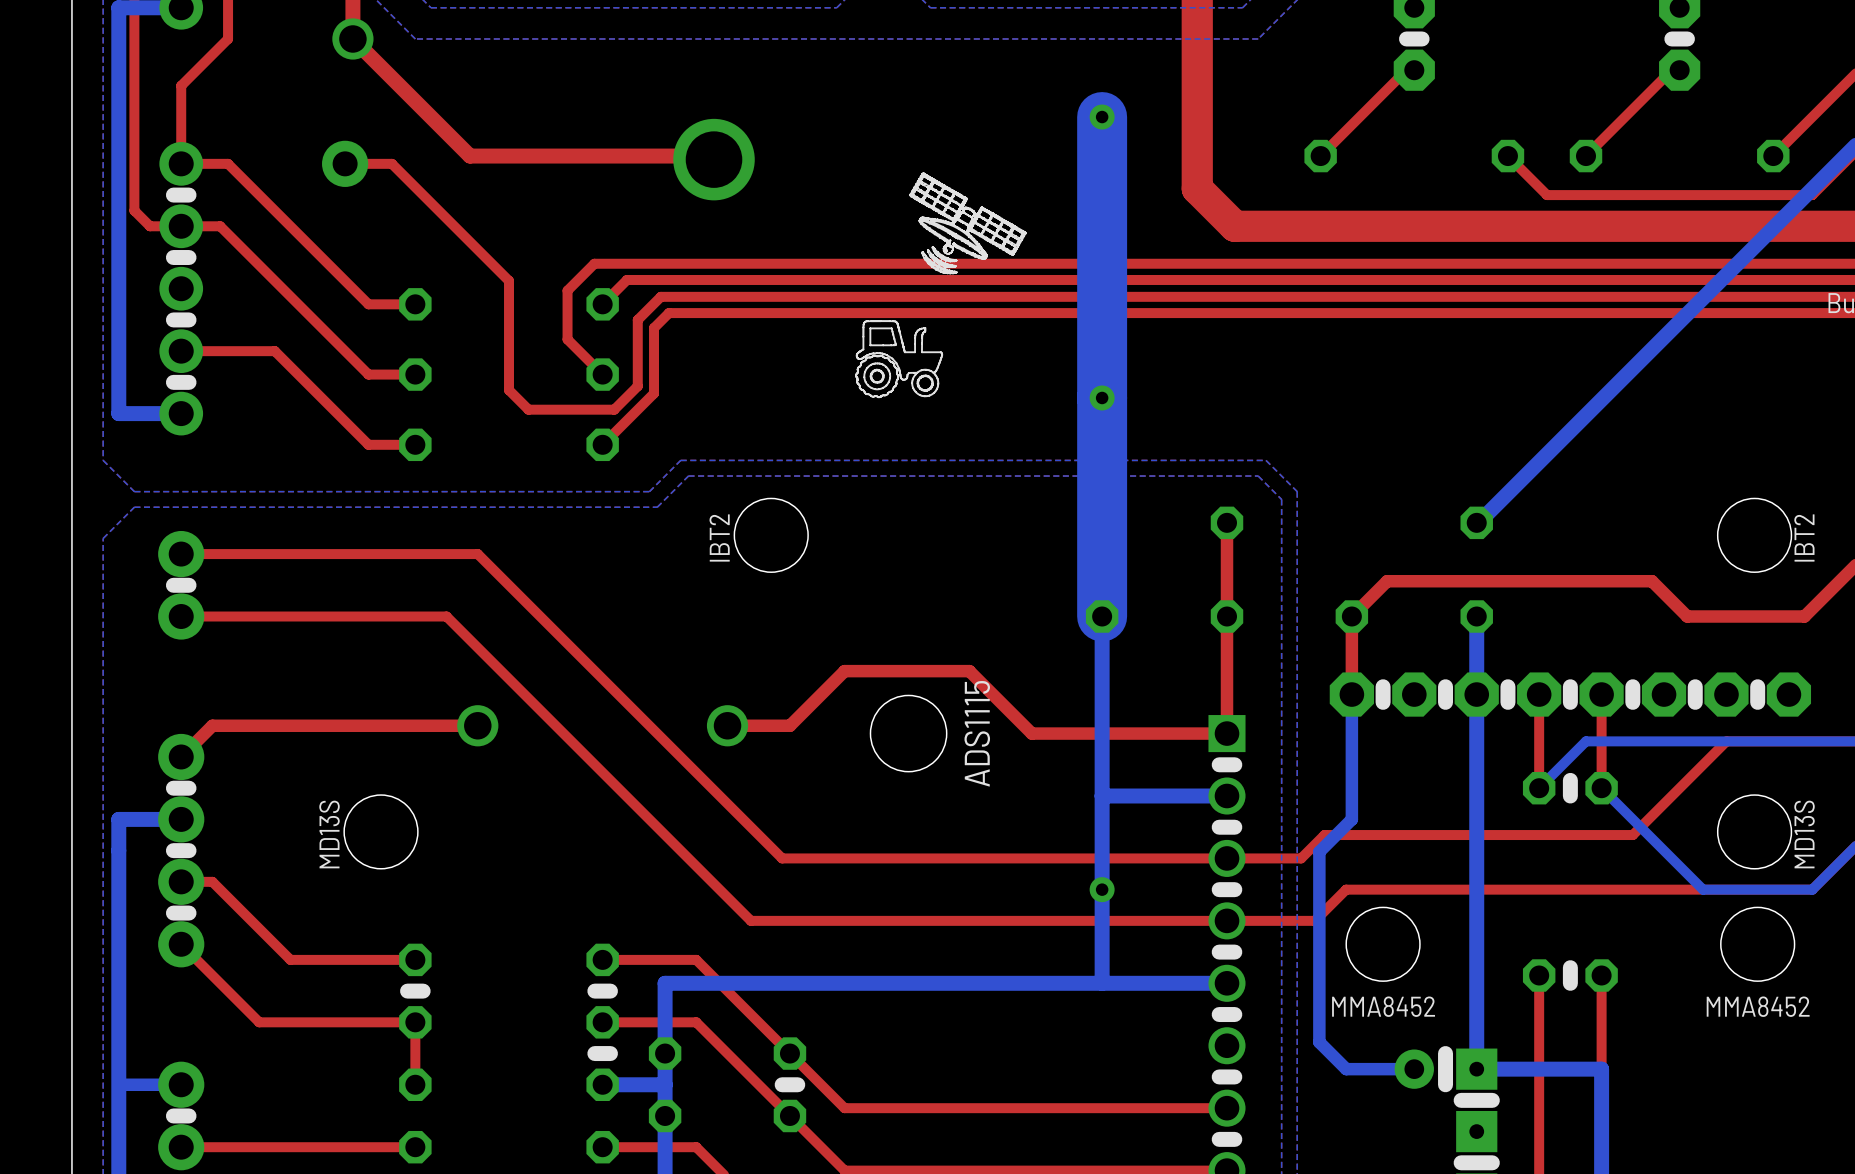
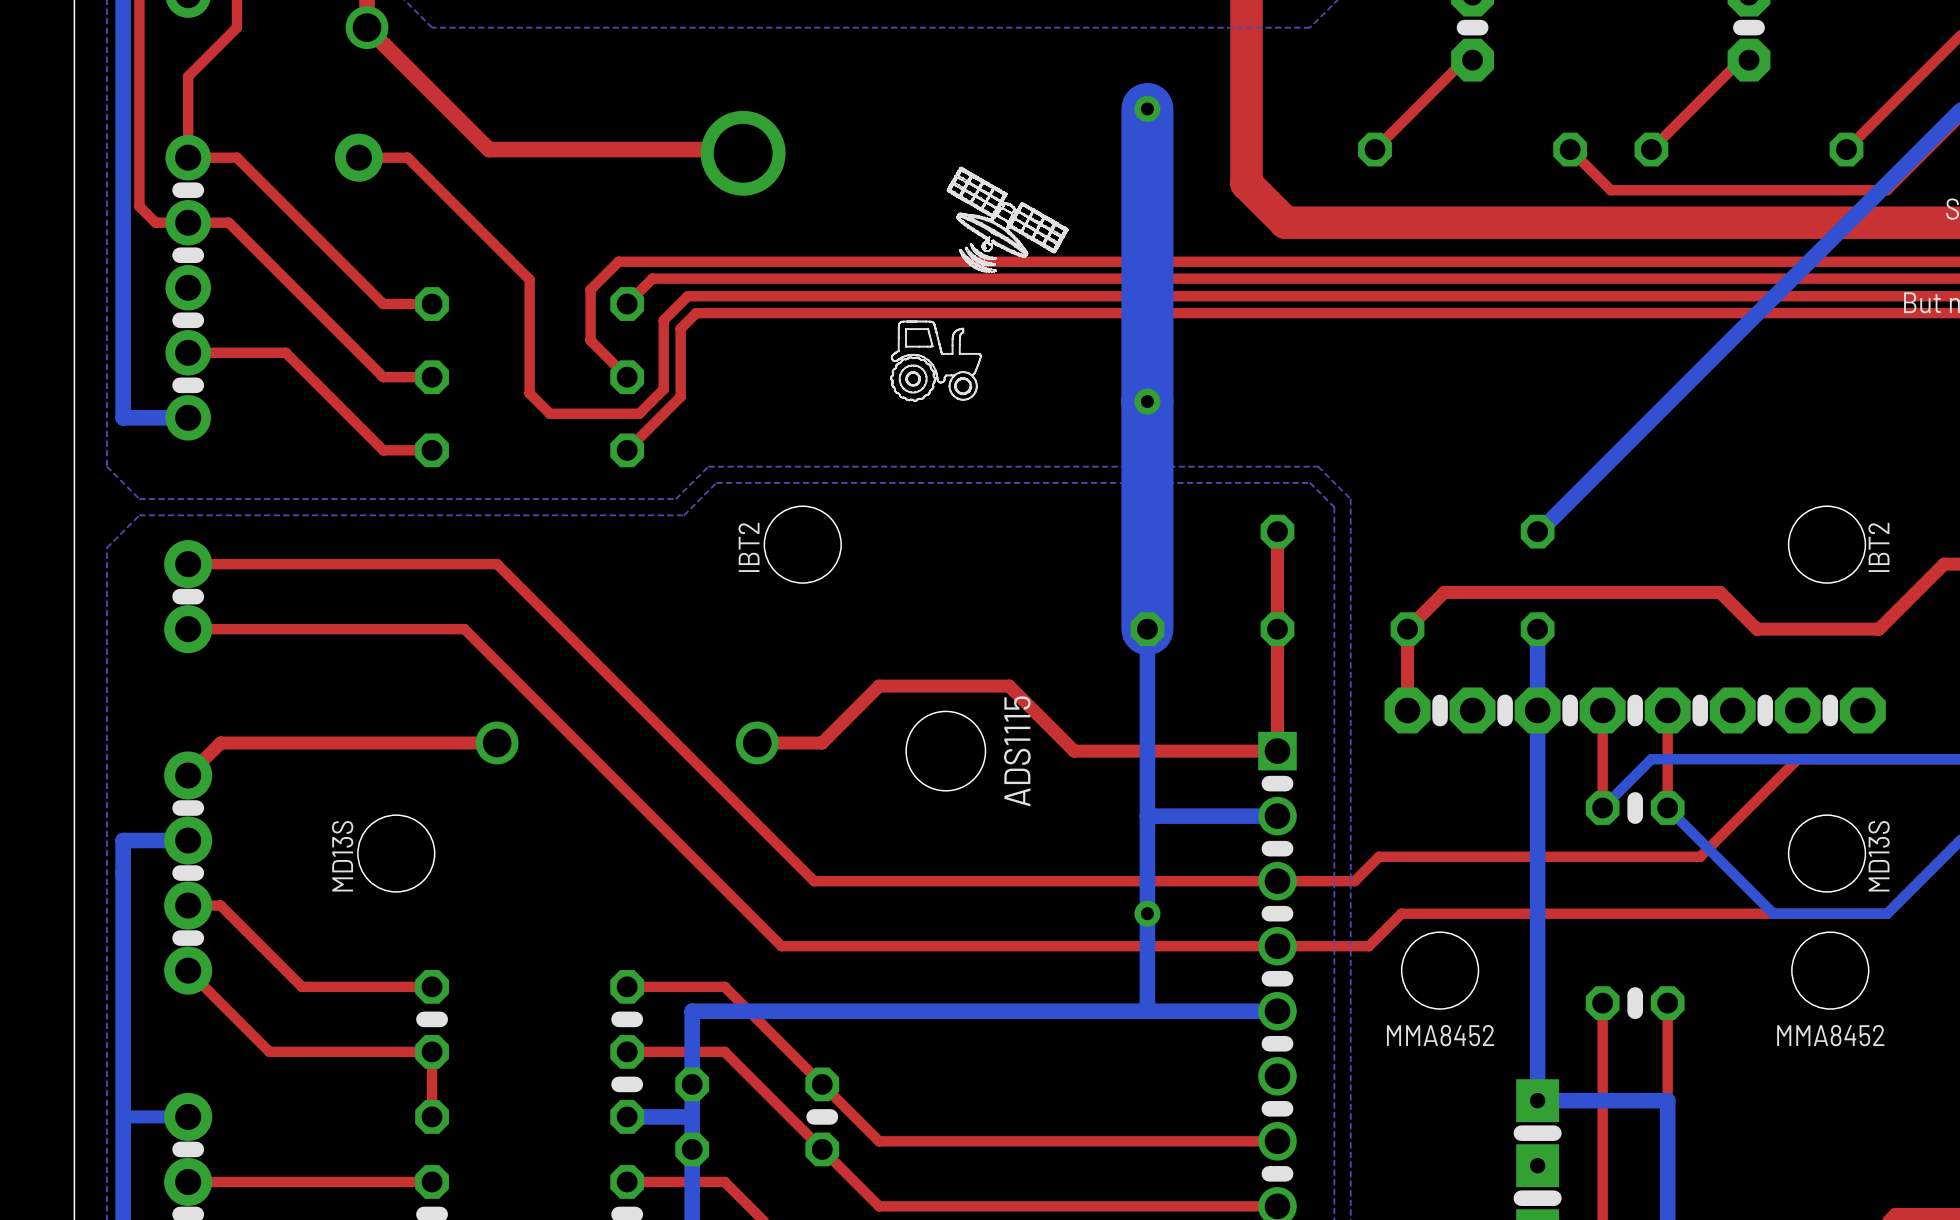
bottom track: (1351, 694) (1351, 819) (1319, 851) (1319, 1042) (1346, 1069) (1414, 1069) -> none
line: (1445, 1053) (1445, 1084) -> none
via: (1414, 1069) -> none

